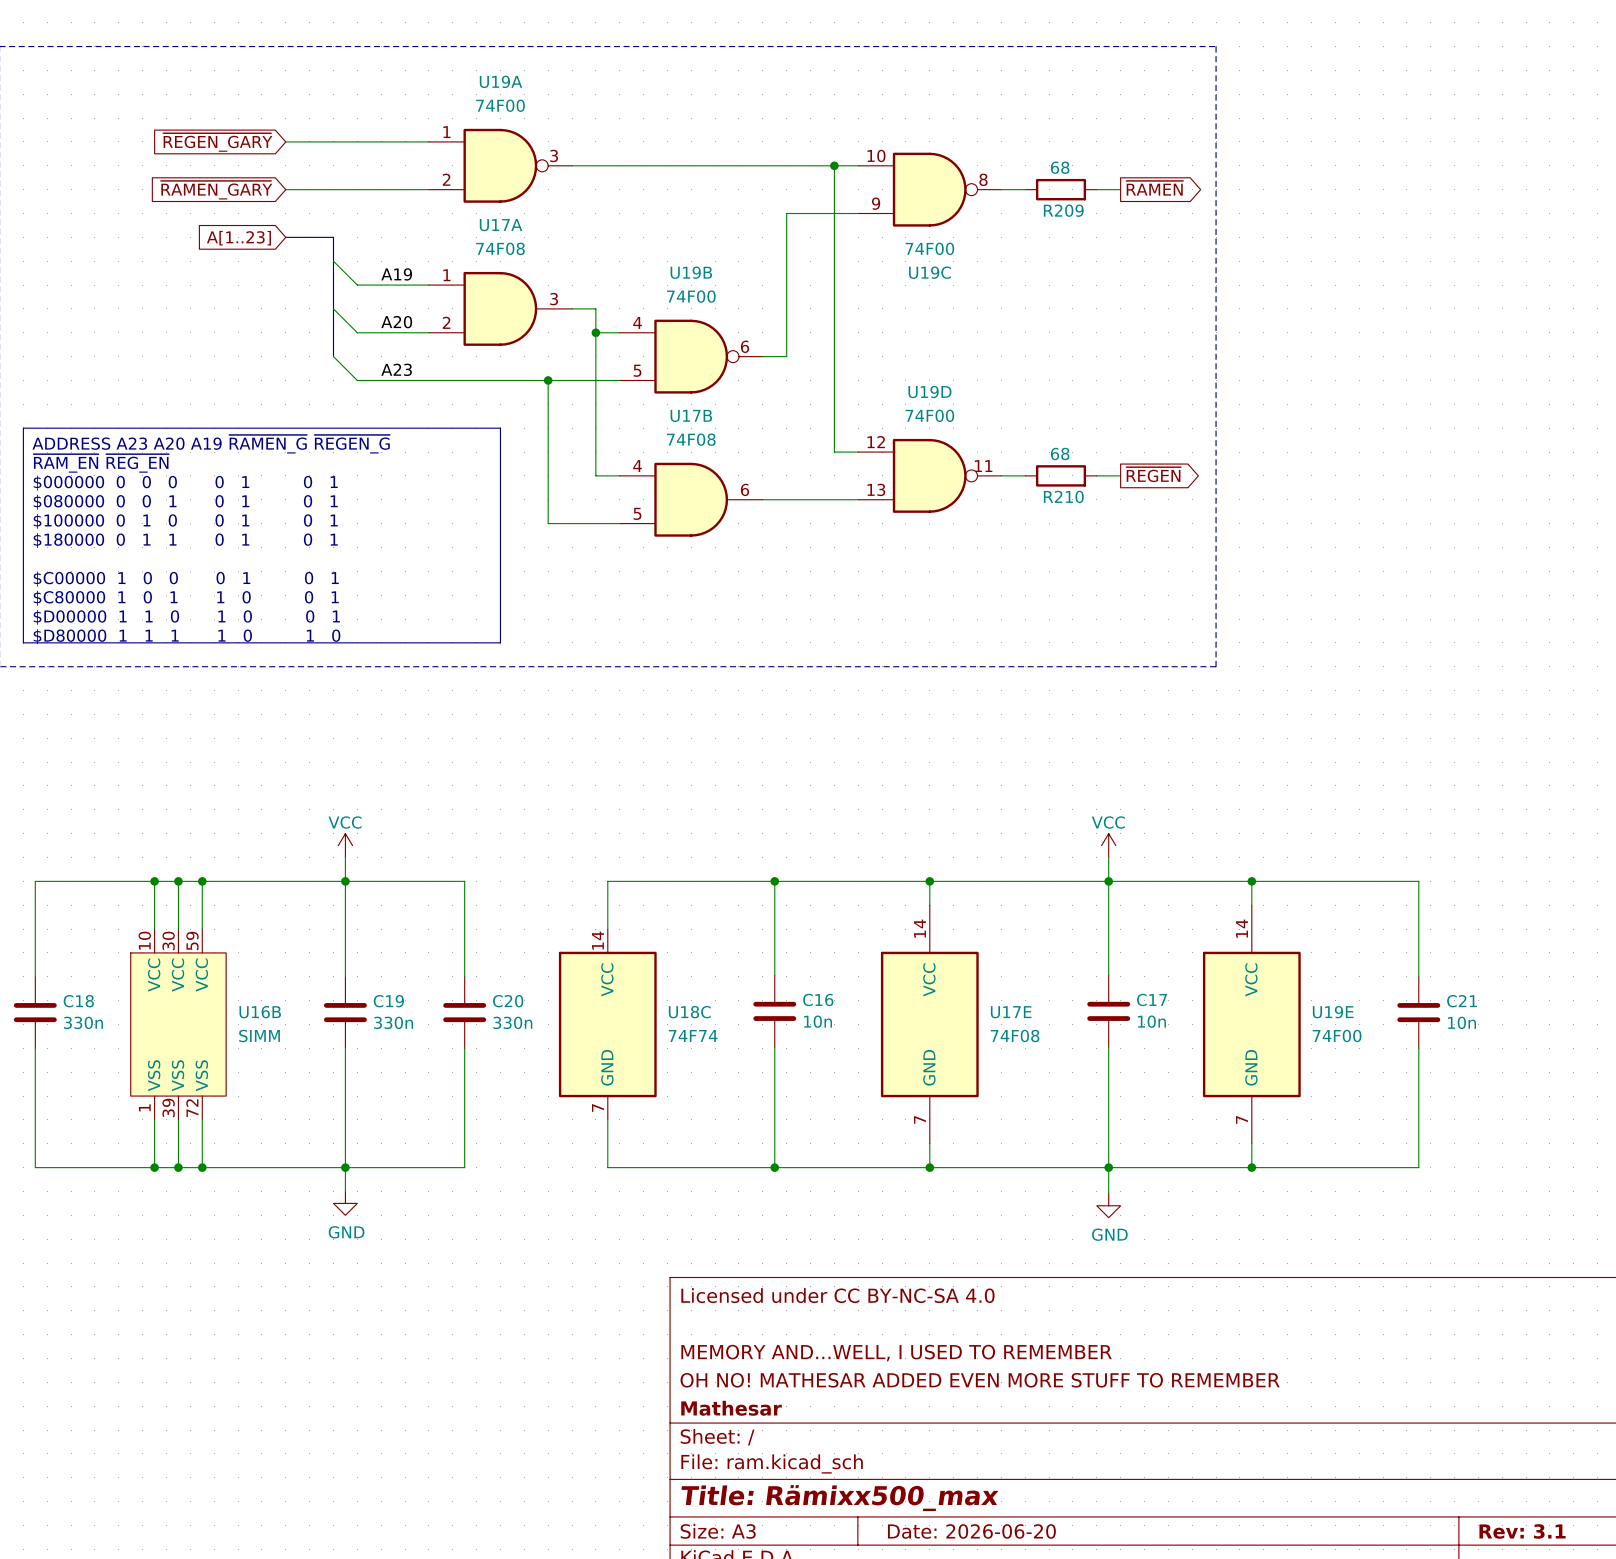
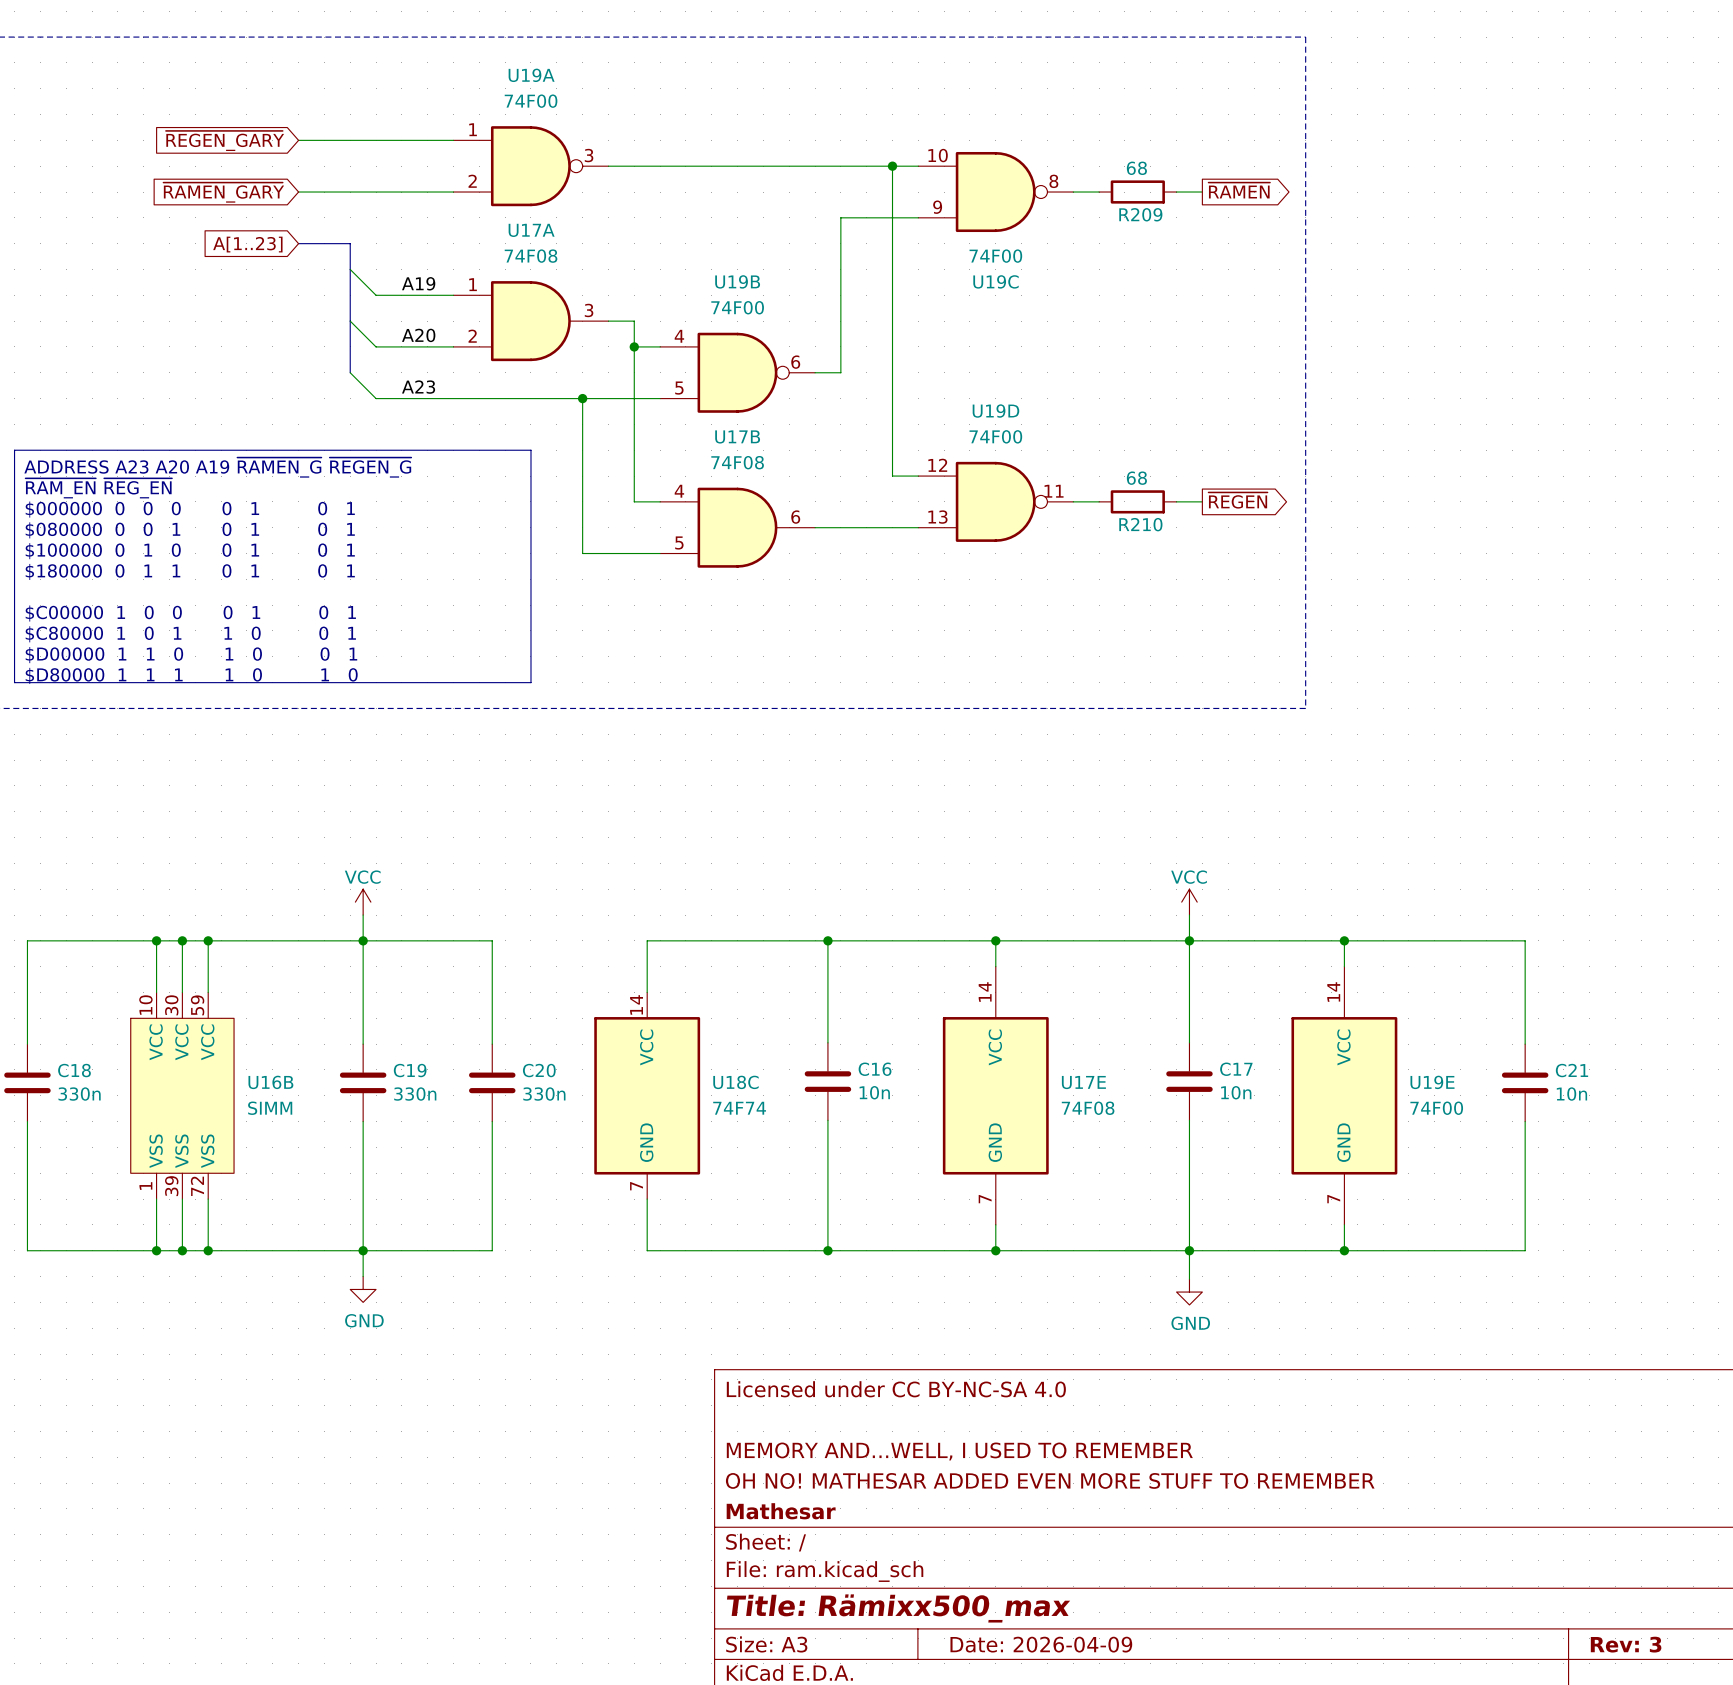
title block: Date: 2026-06-20 (971, 1531) -> Date: 2026-04-09 (1041, 1644)
title block: Rev: 3.1 (1522, 1531) -> Rev: 3 (1626, 1644)

